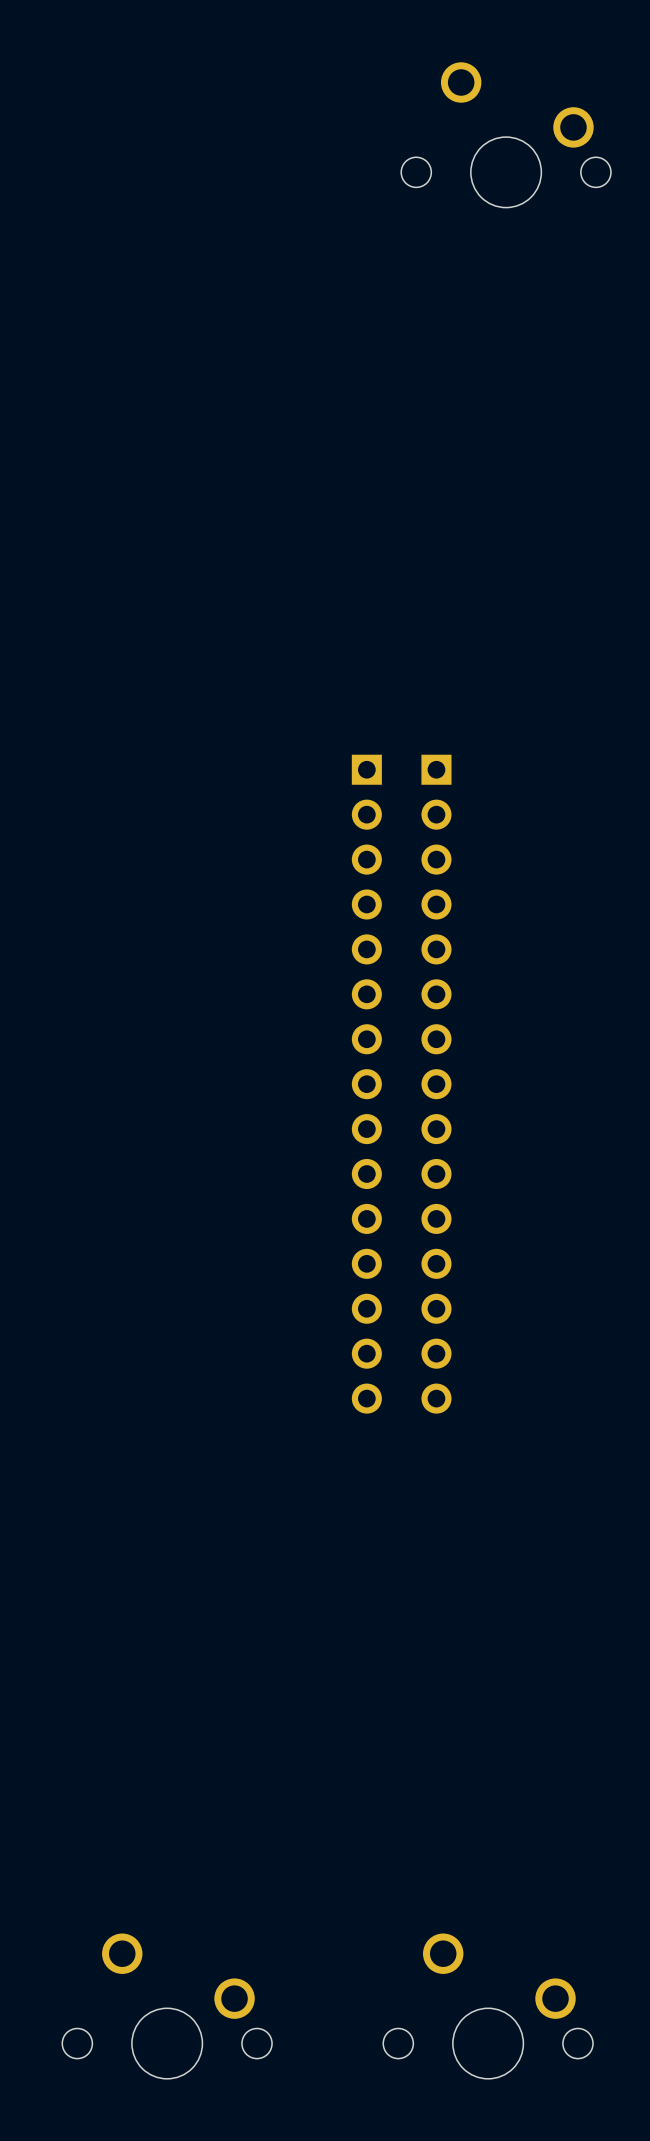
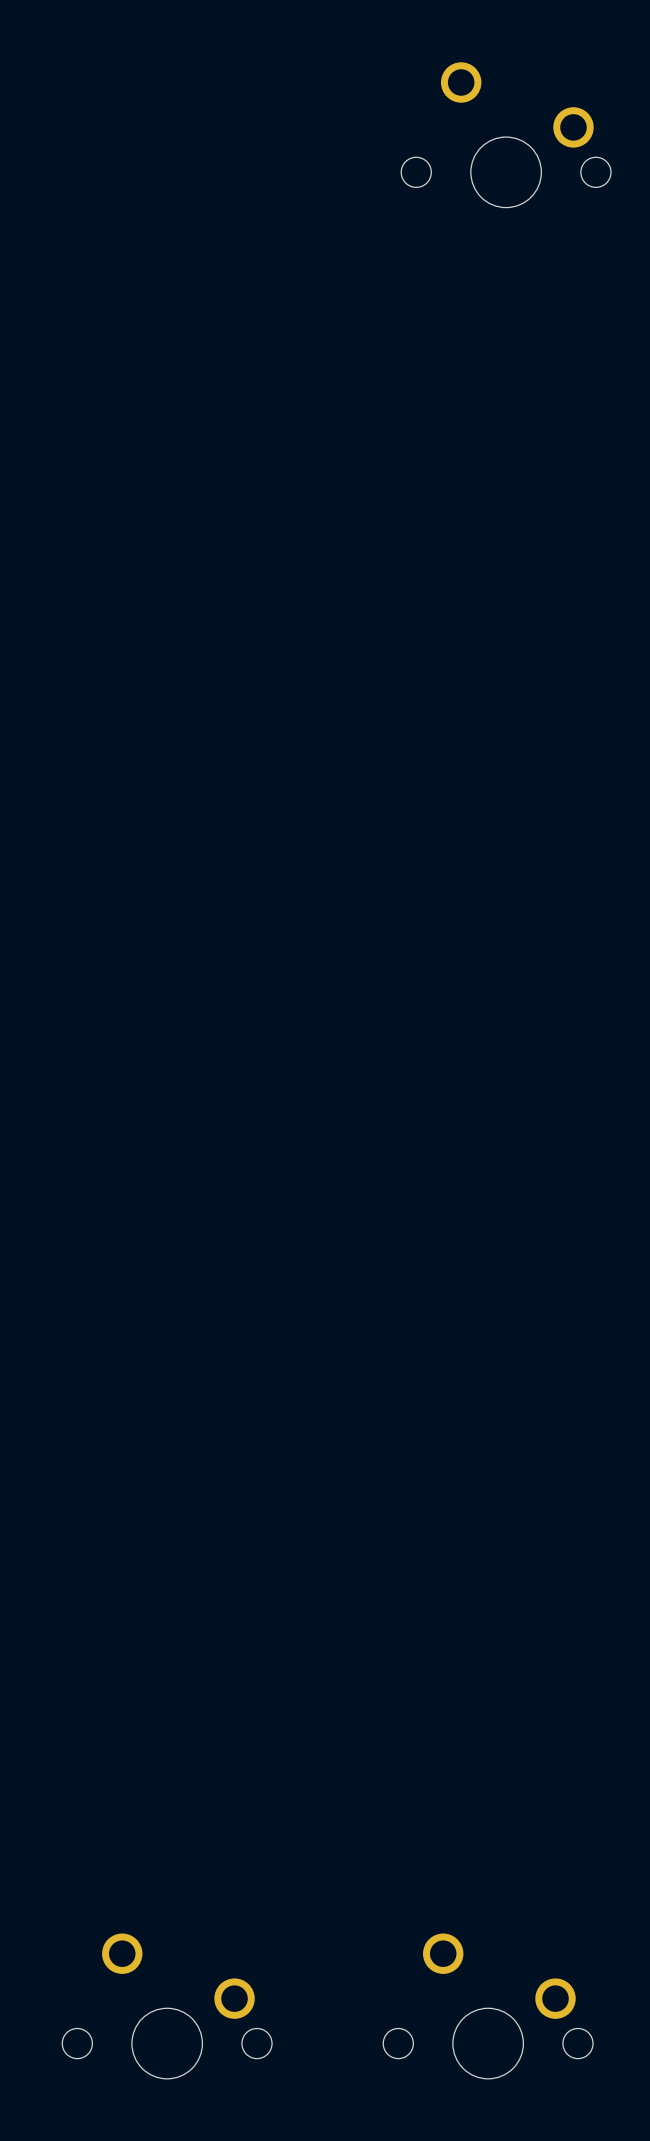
part: (366, 1084) -> none
part: (436, 1084) -> none

